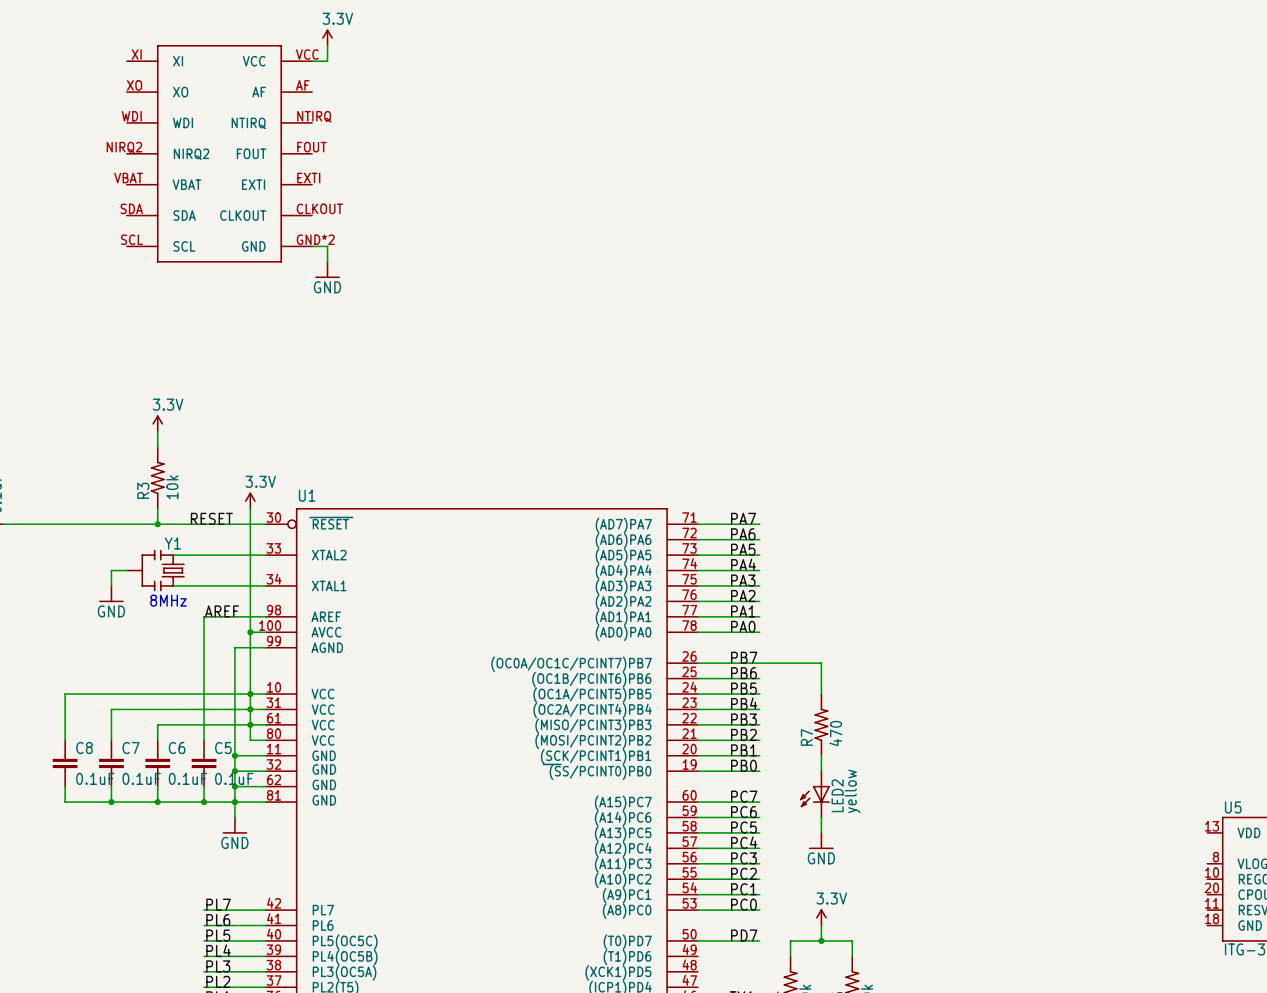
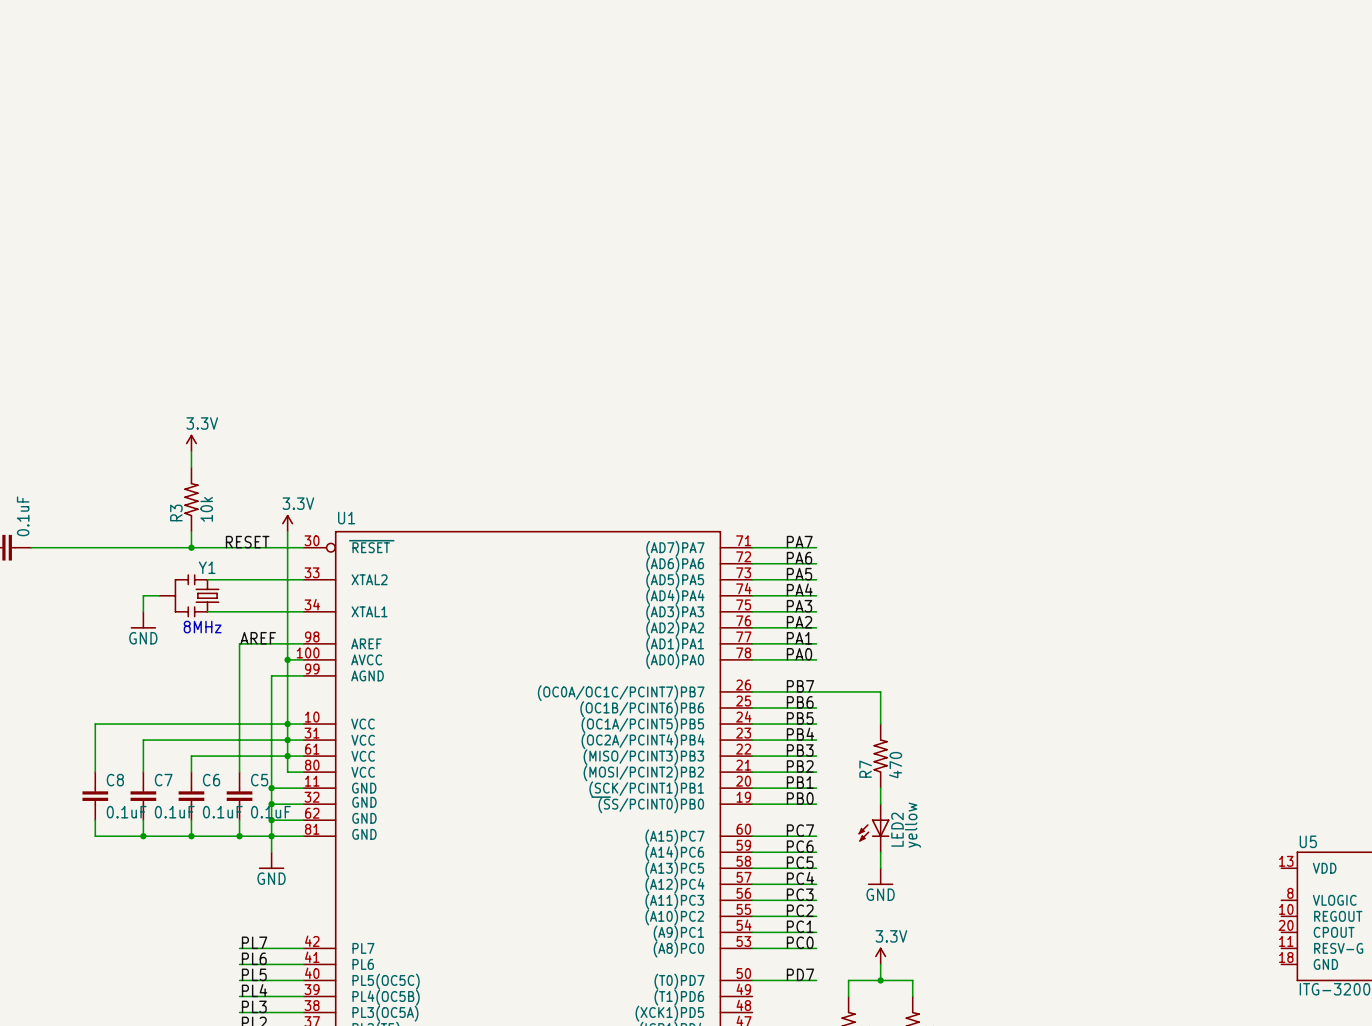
power symbol: 3.3V (327, 37) -> none
wire: (327, 45) (327, 61) (312, 61) -> none
part: (219, 153) -> none
wire: (312, 246) (327, 246) (327, 261) -> none
power symbol: GND (327, 269) -> none

